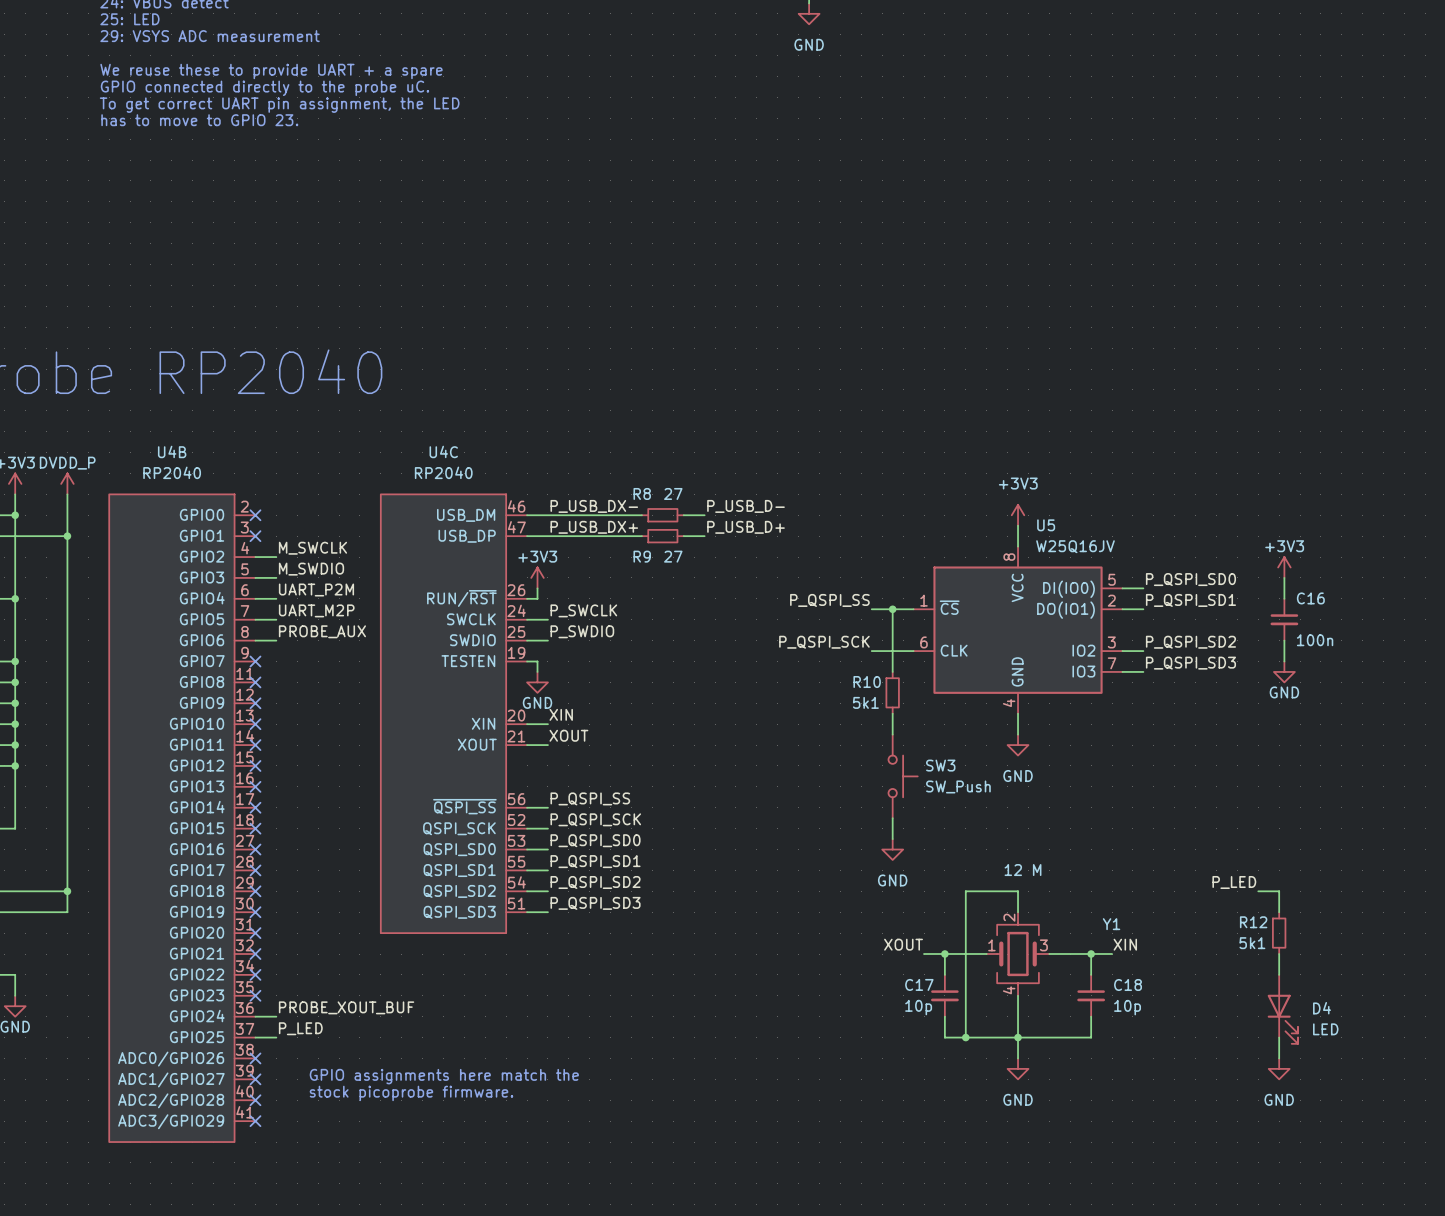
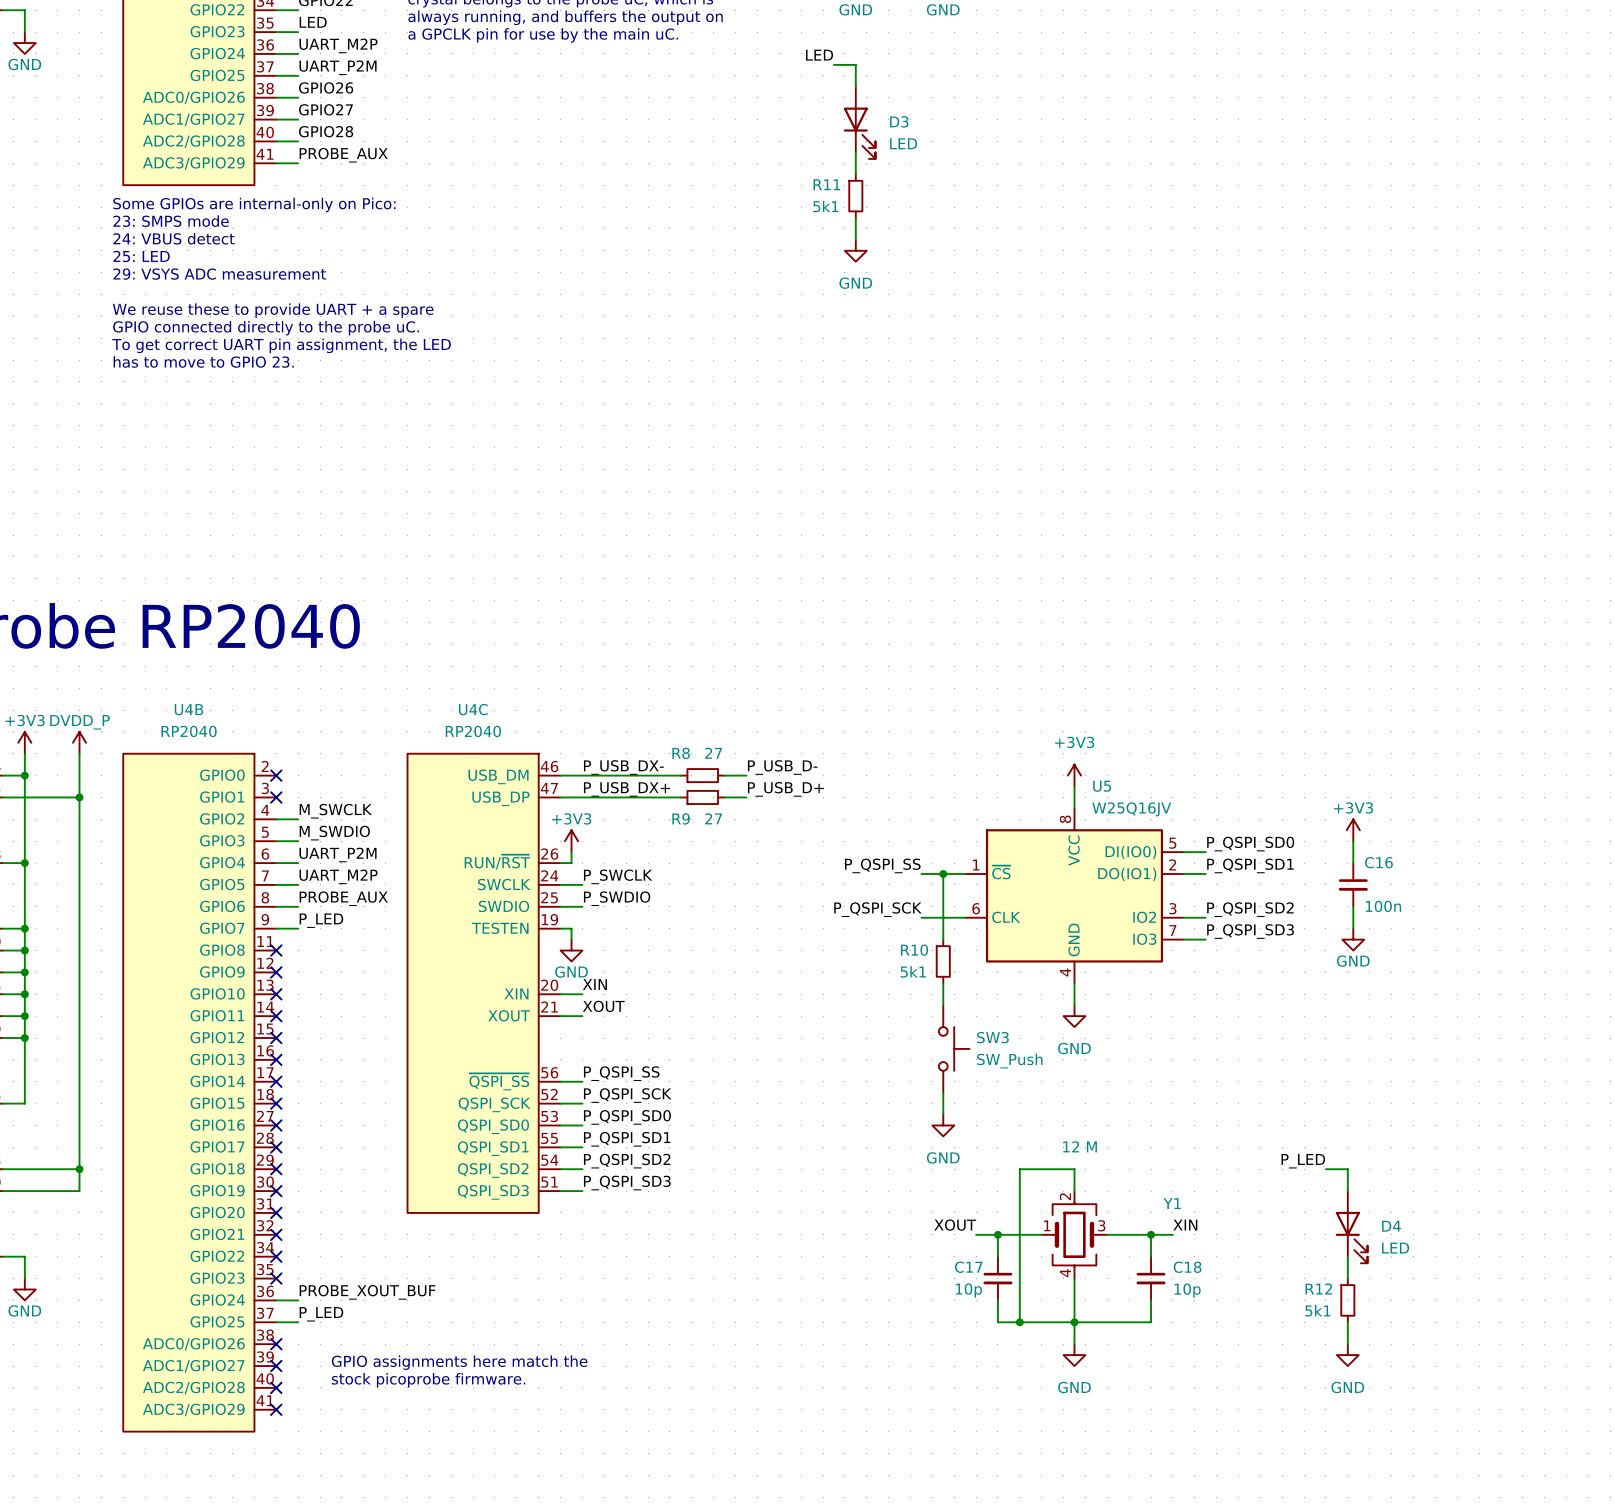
label: none -> P_LED (321, 920)
wire: none -> (276, 928) (298, 928)
no-connect mark: (255, 661) -> none
R12 position: (1279, 933) -> (1347, 1300)
D4 position: (1282, 1009) -> (1351, 1227)

